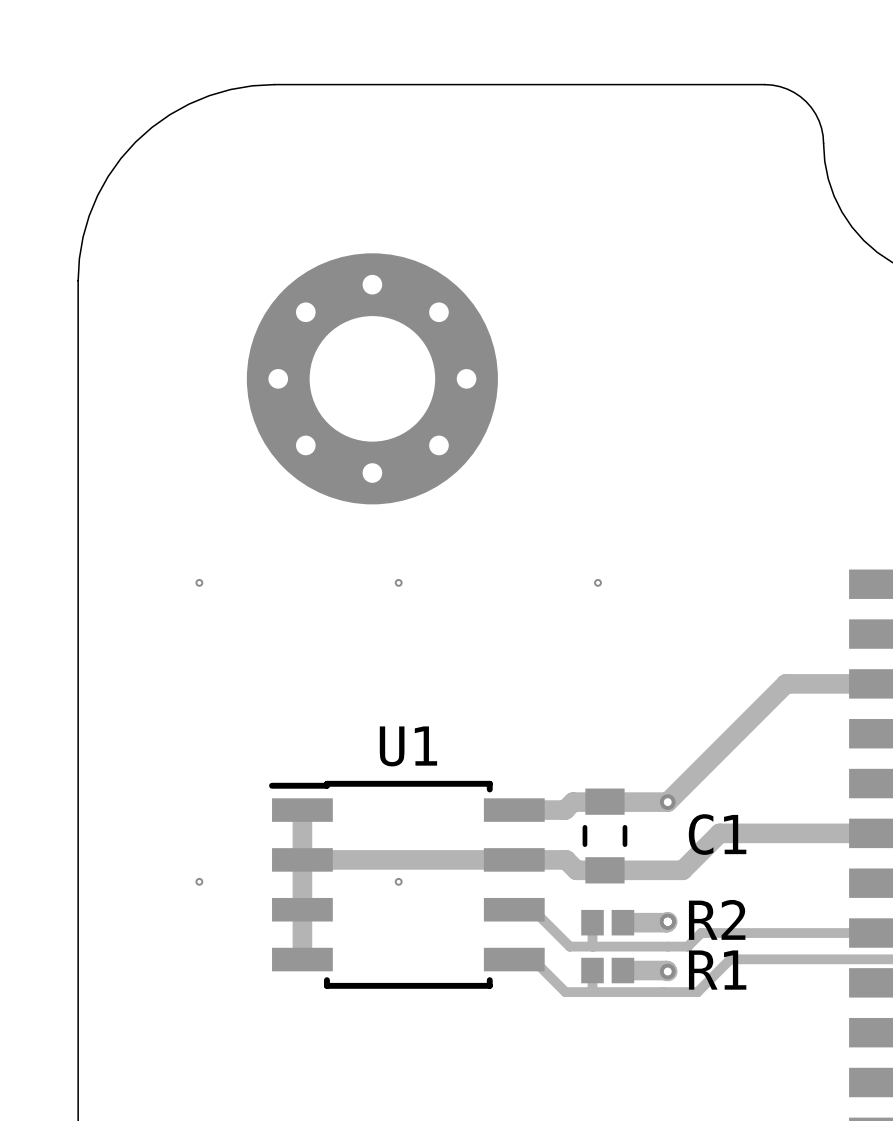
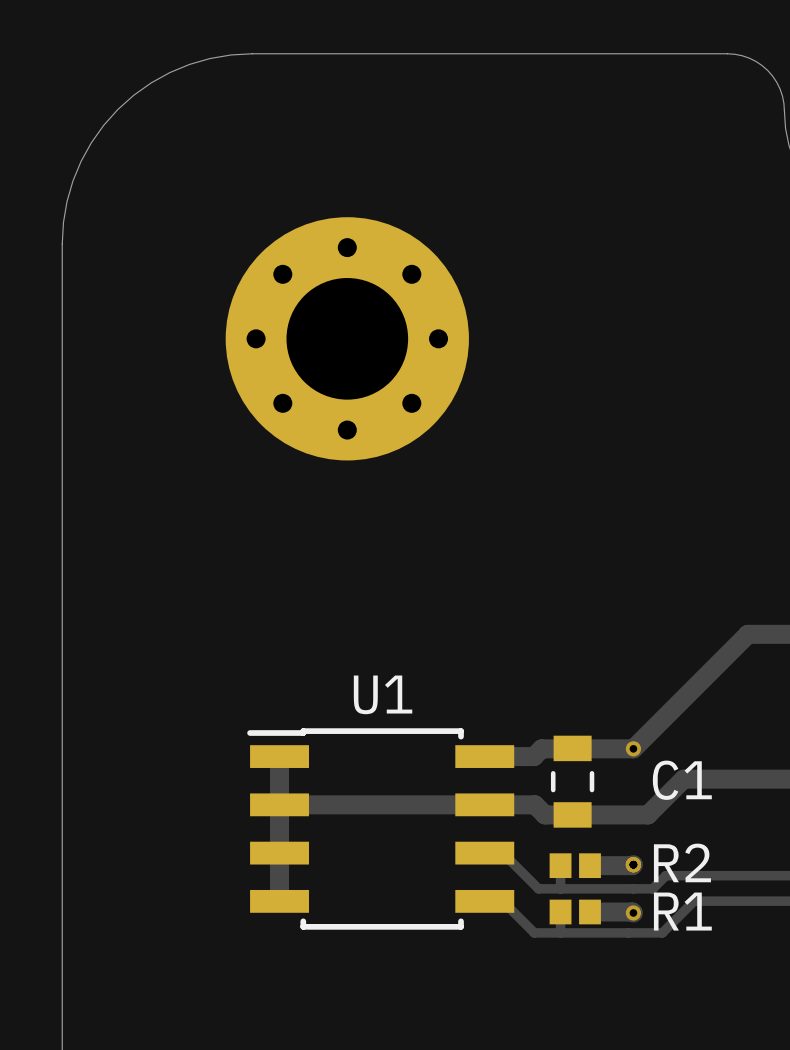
via: (199, 582) -> none
via: (398, 582) -> none
via: (597, 582) -> none
via: (199, 881) -> none
via: (398, 881) -> none

